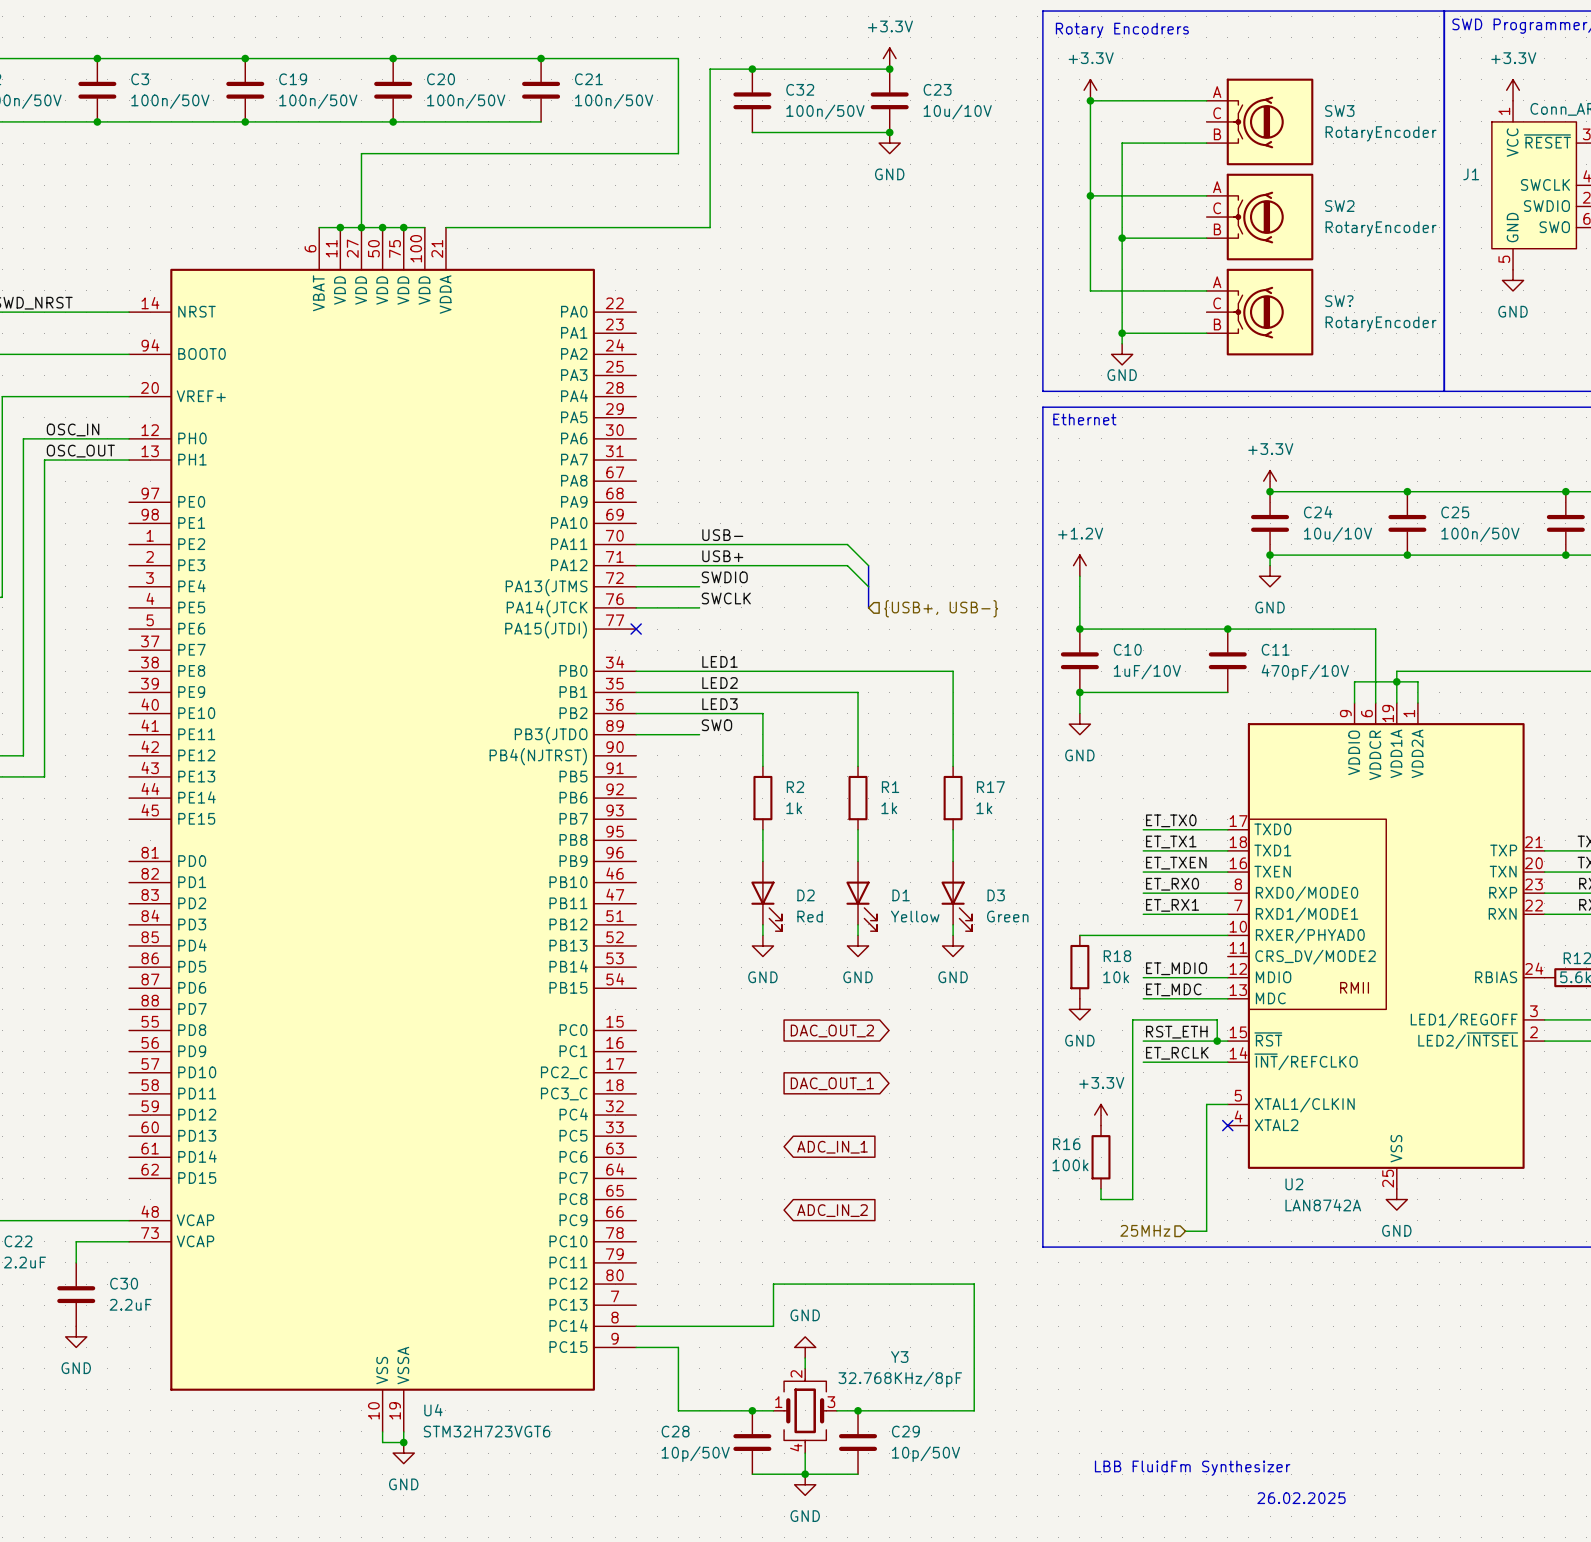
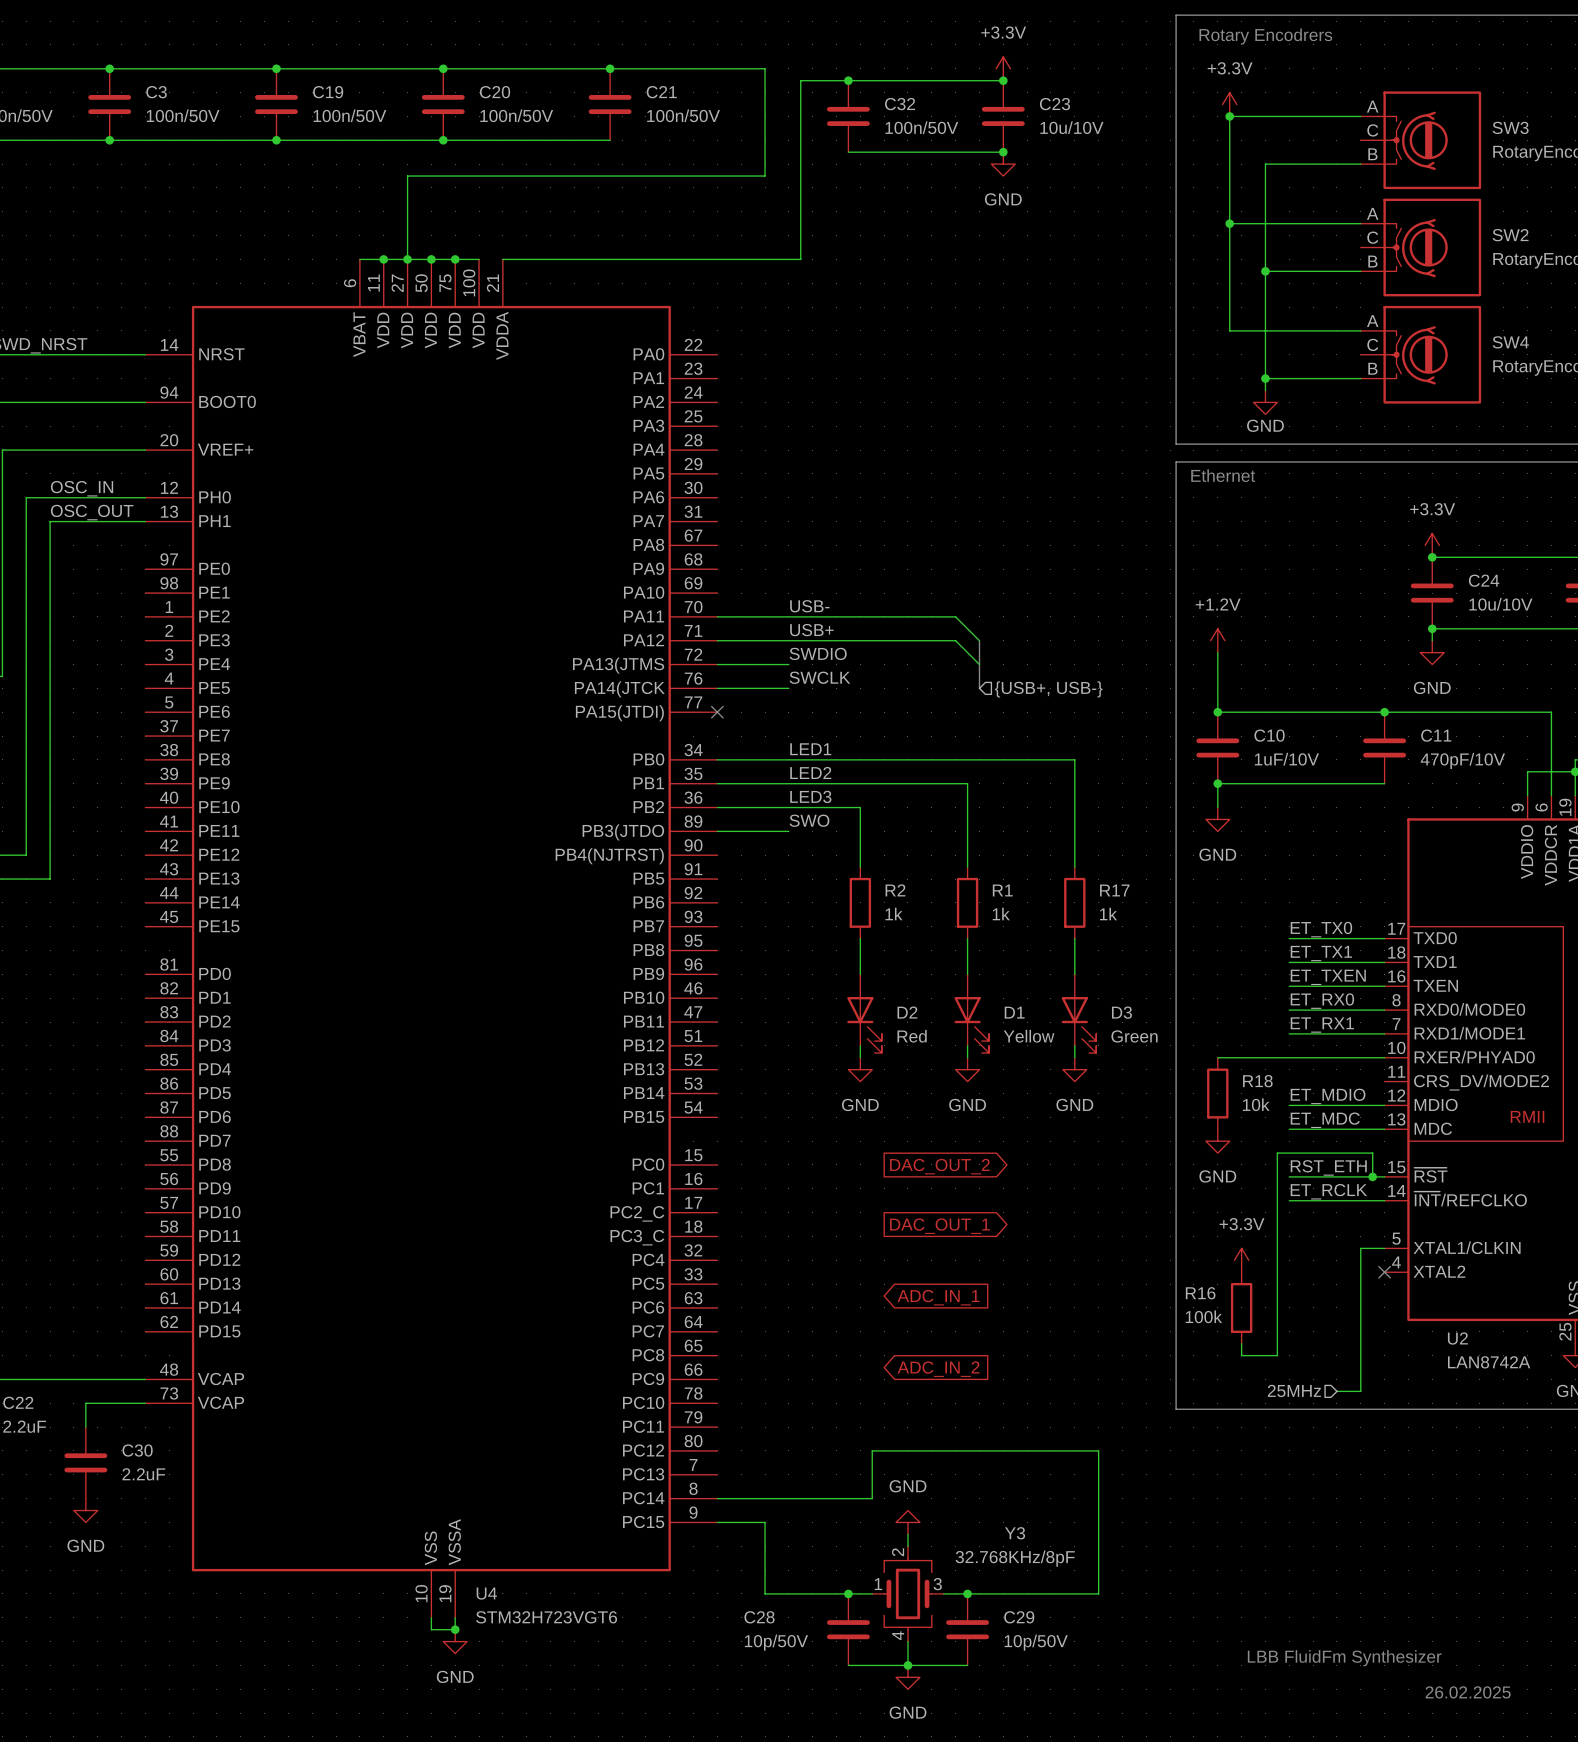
SW? name: SW? (1339, 301) -> SW4 (1510, 342)

